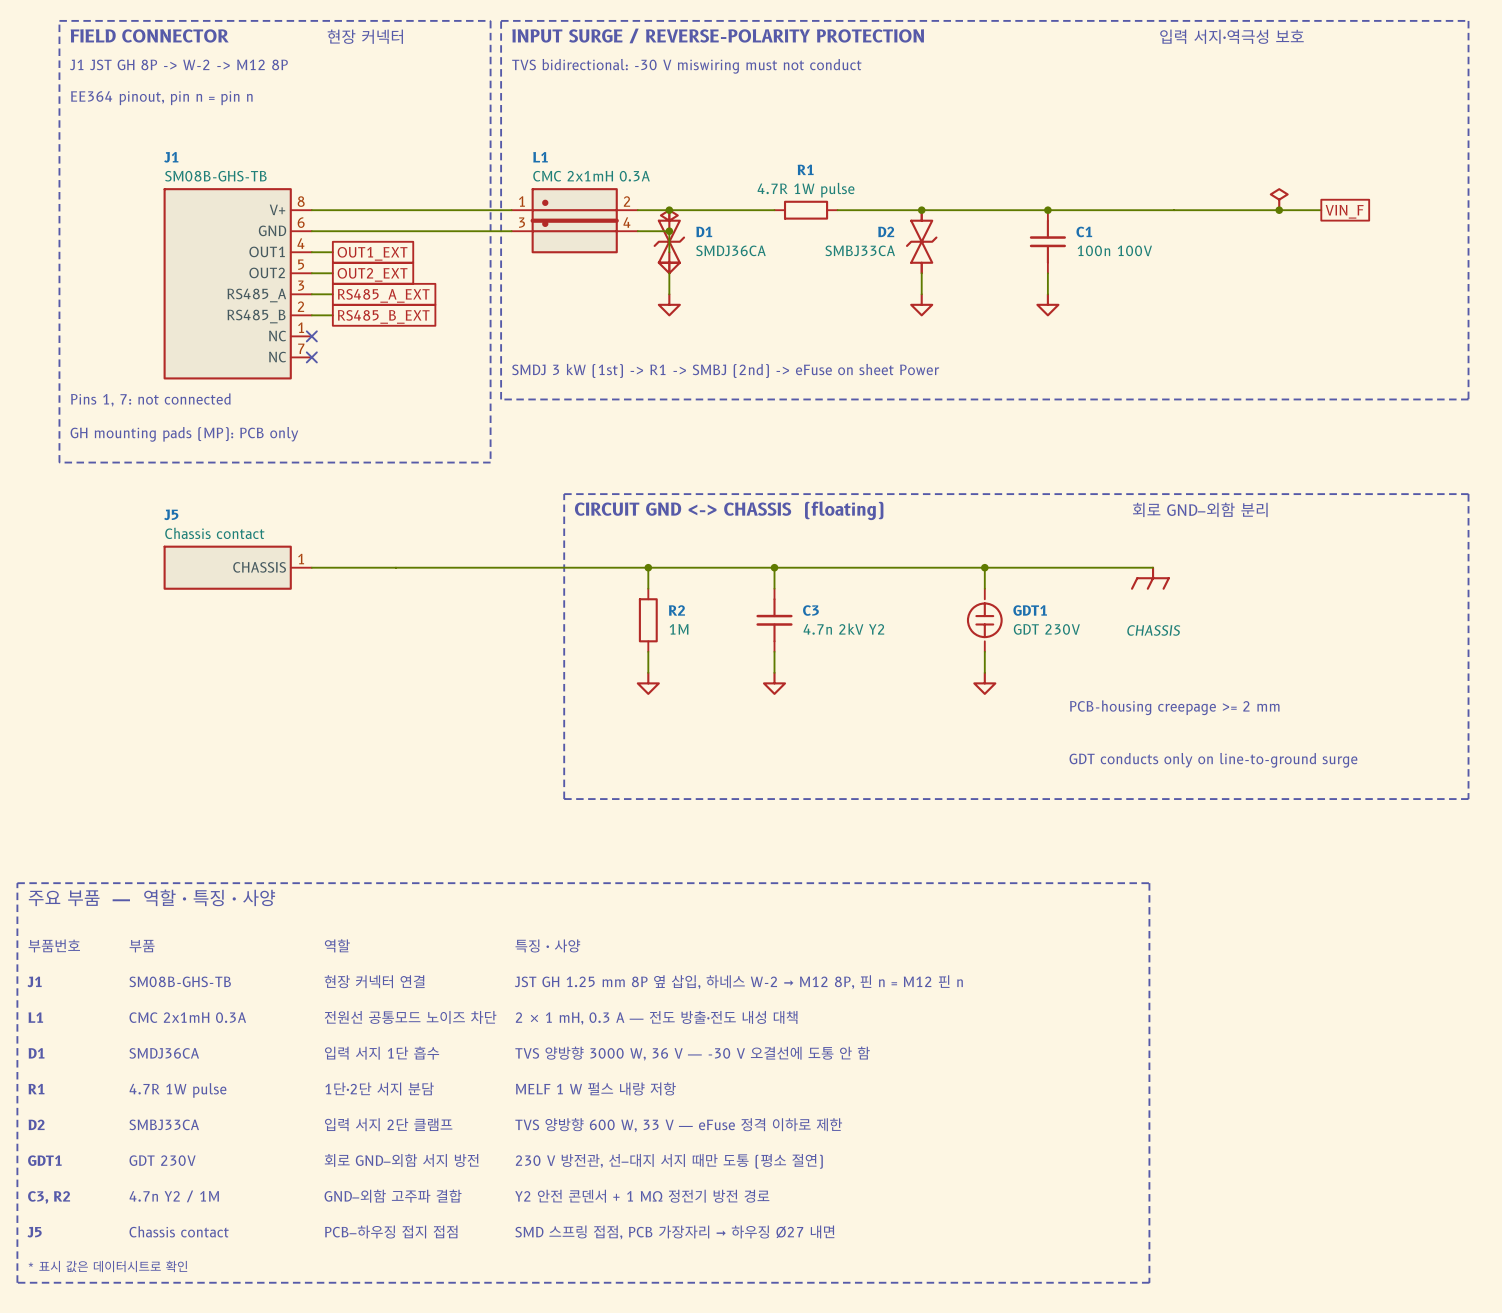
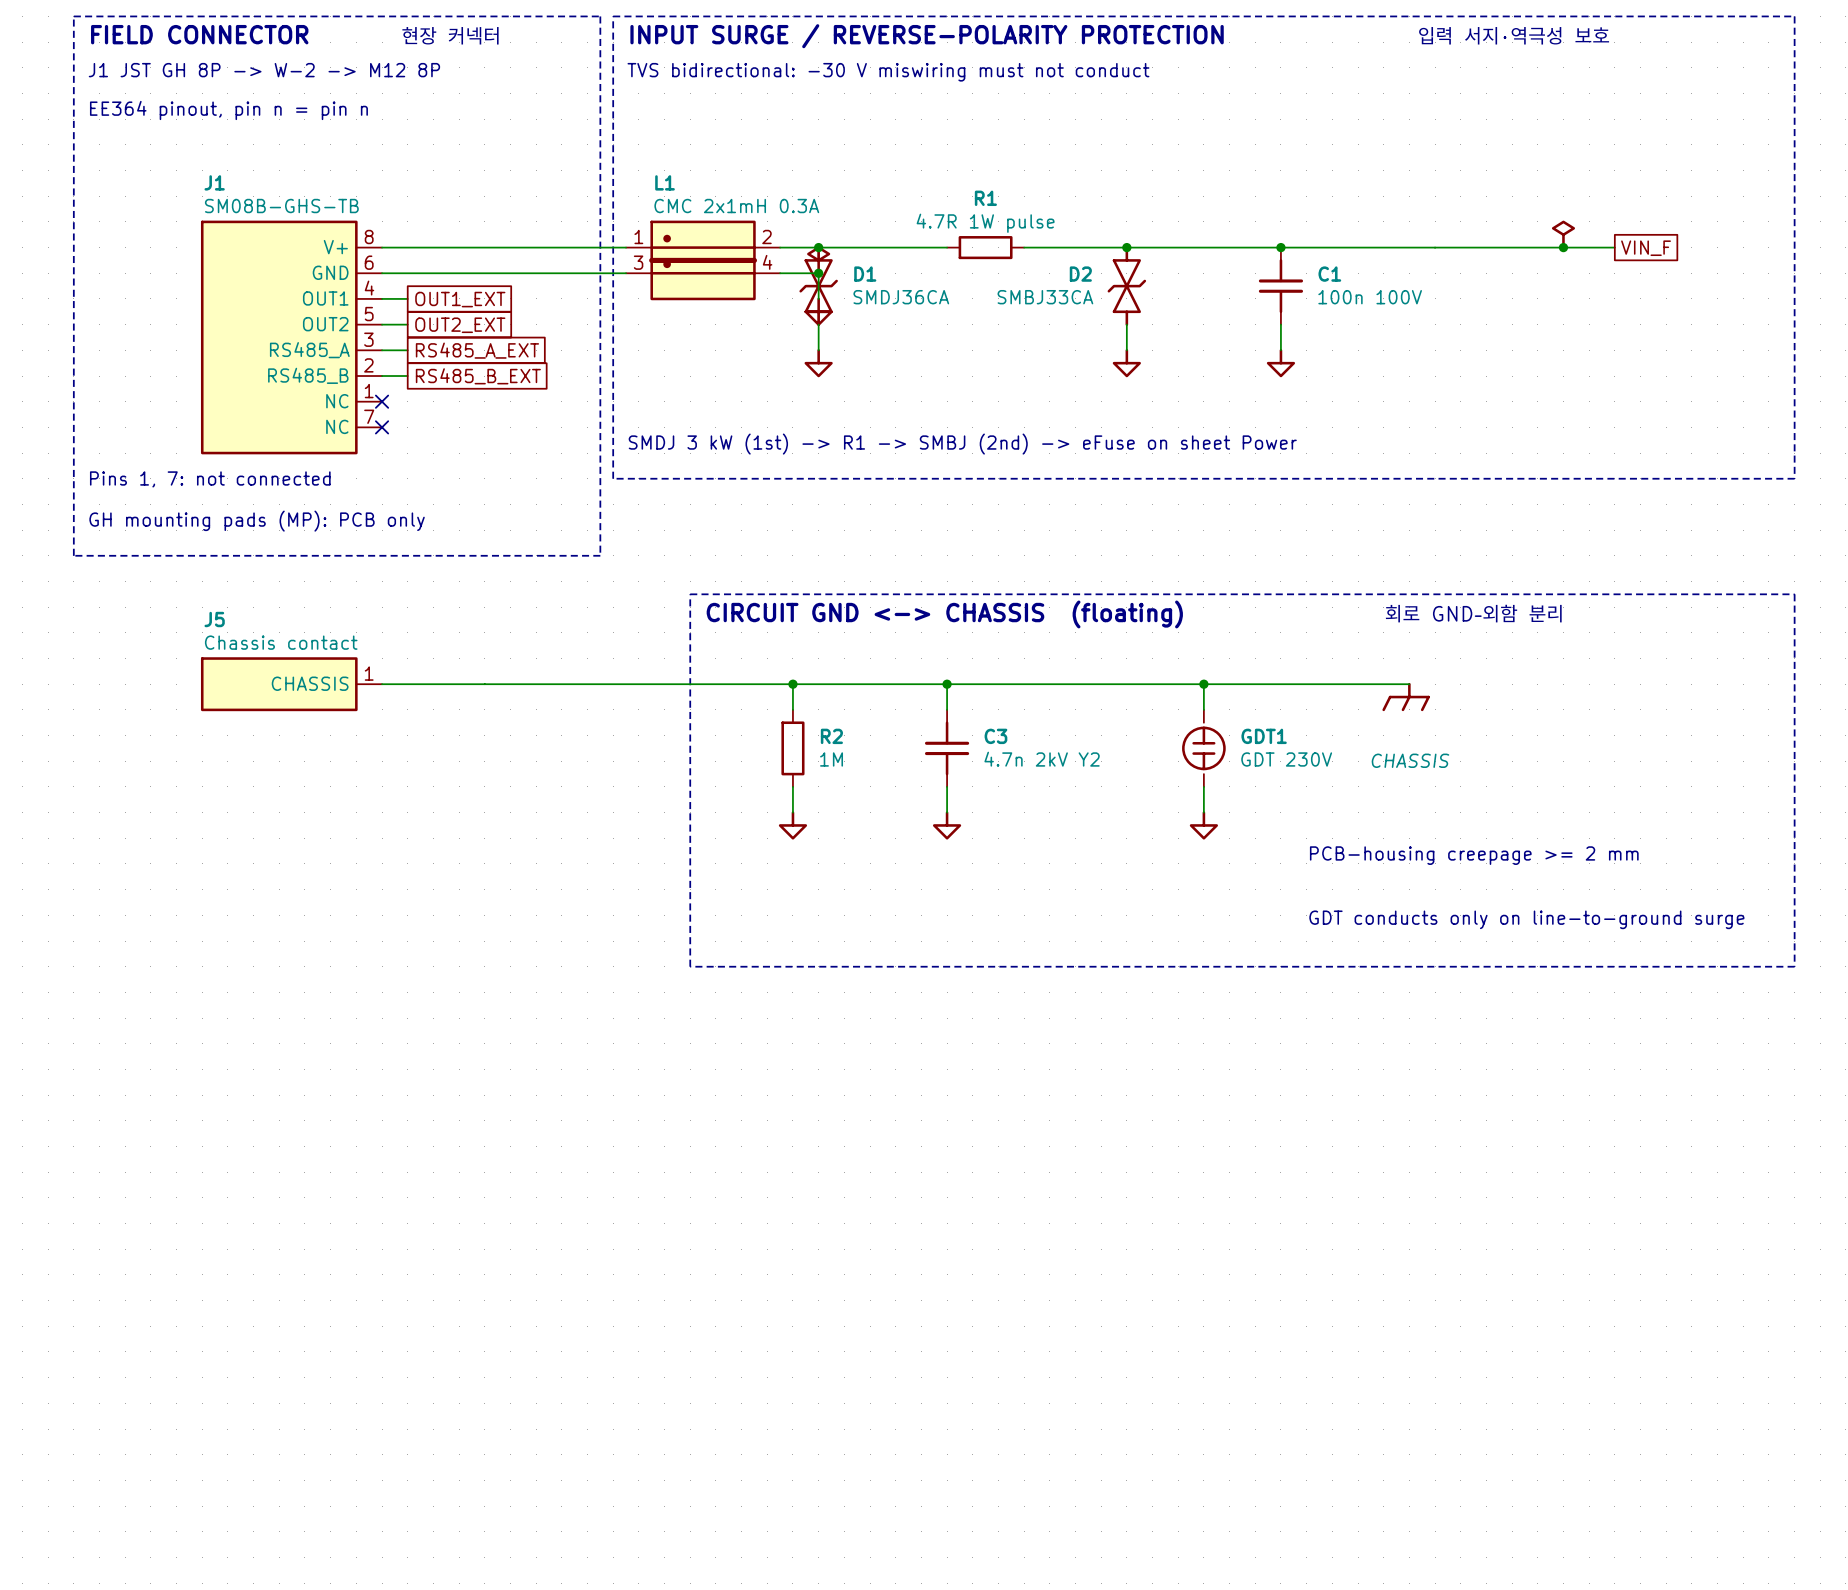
line: (17, 883) (1149, 883) (1149, 1282) (17, 1282) (17, 883) -> none
text: 주요 부품 — 역할 · 특징 · 사양 (151, 897) -> none
text: 부품번호 (54, 945) -> none
text: 역할 (337, 945) -> none
text: 특징 · 사양 (547, 945) -> none
text: 부품 (142, 946) -> none
text: J1 (34, 981) -> none
text: SM08B-GHS-TB (180, 981) -> none
text: 현장 커넥터 연결 (374, 981) -> none
text: JST GH 1.25 mm 8P 옆 삽입, 하네스 W-2 → M12 8P, 핀 n = M12 핀 n (738, 982) -> none
text: L1 (35, 1017) -> none
text: CMC 2x1mH 0.3A (187, 1017) -> none
text: 전원선 공통모드 노이즈 차단 (410, 1017) -> none
text: 2 × 1 mH, 0.3 A — 전도 방출·전도 내성 대책 (656, 1017) -> none
text: D1 (36, 1053) -> none
text: SMDJ36CA (164, 1053) -> none
text: 입력 서지 1단 흡수 (382, 1053) -> none
text: TVS 양방향 3000 W, 36 V — -30 V 오결선에 도통 안 함 (692, 1053) -> none
text: 1단·2단 서지 분담 (379, 1088) -> none
text: MELF 1 W 펄스 내량 저항 (595, 1088) -> none
text: R1 (36, 1089) -> none
text: 4.7R 1W pulse (177, 1090) -> none
text: D2 (36, 1124) -> none
text: SMBJ33CA (164, 1124) -> none
text: 입력 서지 2단 클램프 (388, 1124) -> none
text: TVS 양방향 600 W, 33 V — eFuse 정격 이하로 제한 (678, 1125) -> none
text: GDT1 (44, 1160) -> none
text: GDT 230V (162, 1160) -> none
text: 회로 GND–외함 서지 방전 (401, 1160) -> none
text: 230 V 방전관, 선–대지 서지 때만 도통 (평소 절연) (669, 1161) -> none
text: 4.7n Y2 / 1M (174, 1196) -> none
text: GND–외함 고주파 결합 (393, 1196) -> none
text: Y2 안전 콘덴서 + 1 MΩ 정전기 방전 경로 (642, 1196) -> none
text: C3, R2 (49, 1197) -> none
text: Chassis contact (179, 1231) -> none
text: PCB–하우징 접지 접점 (391, 1231) -> none
text: J5 (34, 1232) -> none
text: SMD 스프링 접점, PCB 가장자리 → 하우징 Ø27 내면 (674, 1232) -> none
text: * 표시 값은 데이터시트로 확인 (107, 1266) -> none

